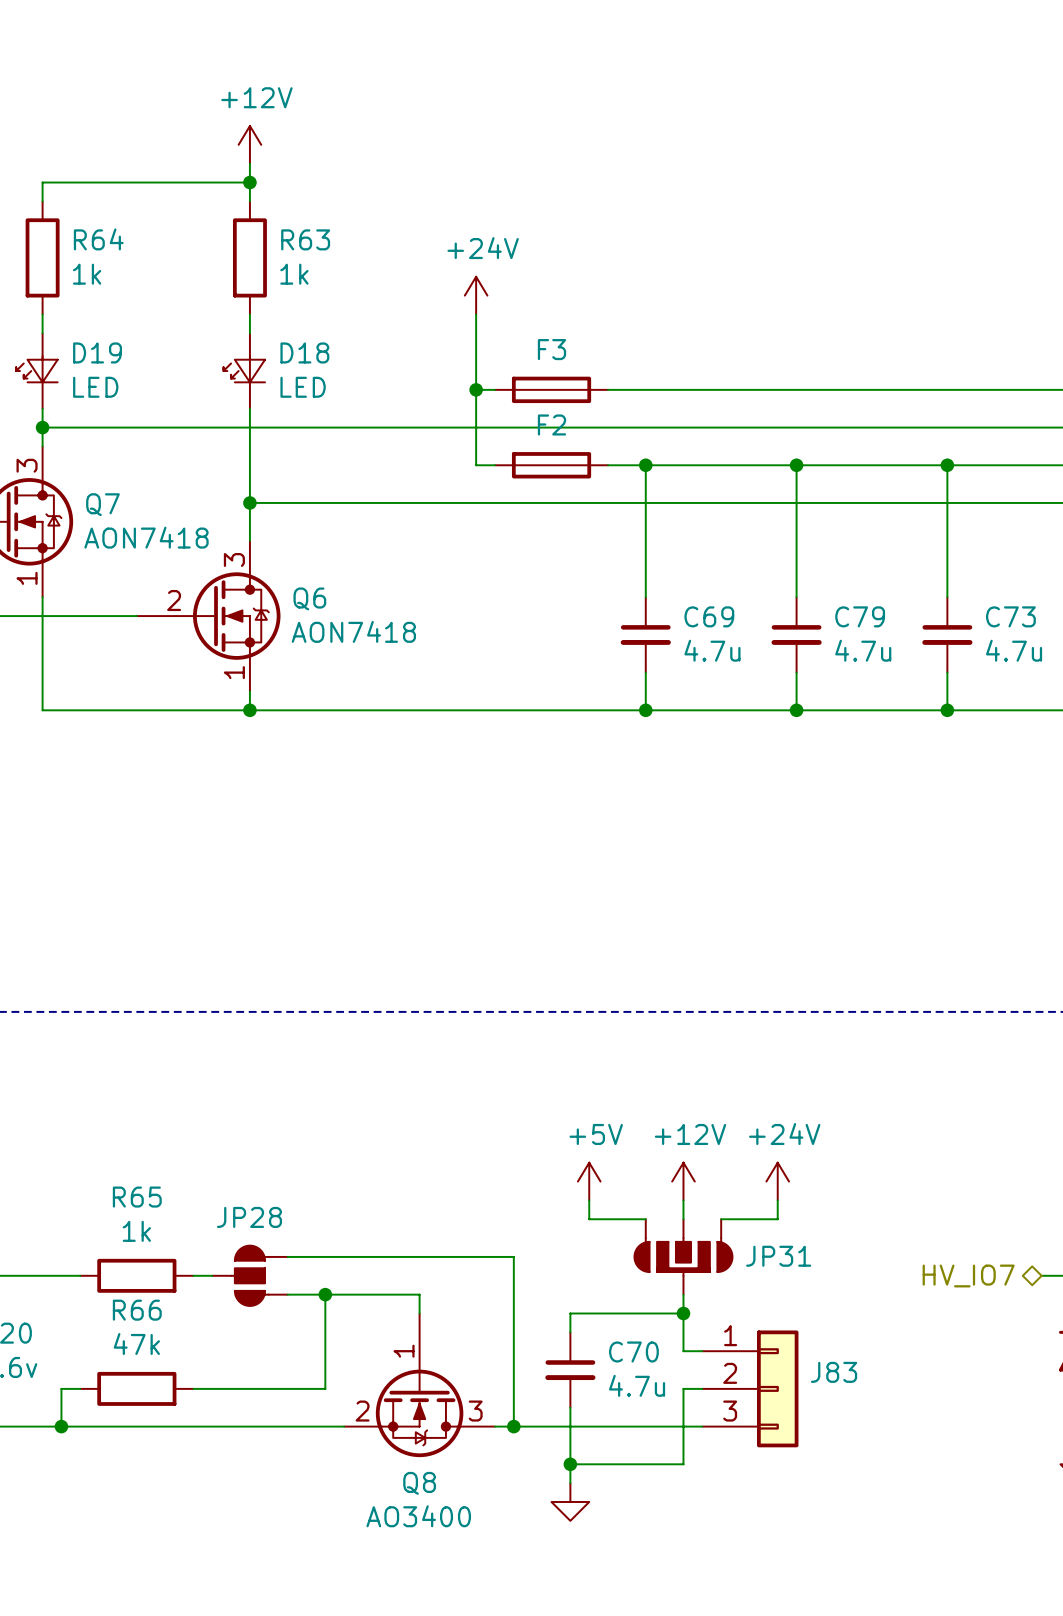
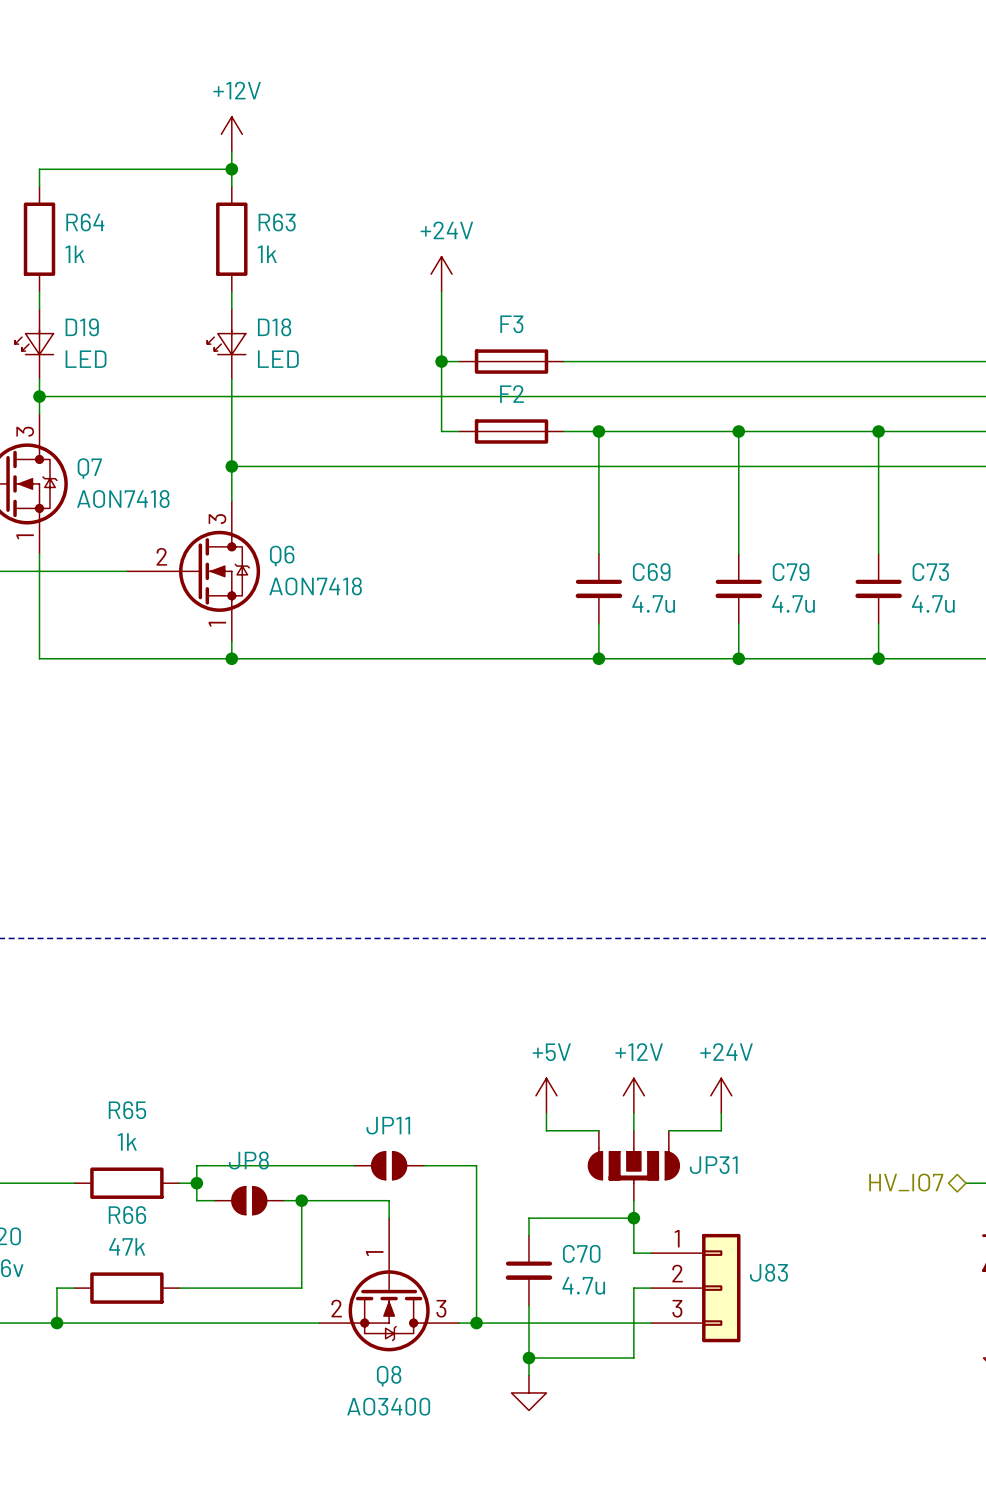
wire: none -> (266, 1165) (196, 1165) (196, 1200) (214, 1200)
JP11: none -> (389, 1165)
junction: none -> (196, 1183)
JP28: (249, 1275) -> none
JP8: none -> (249, 1200)

